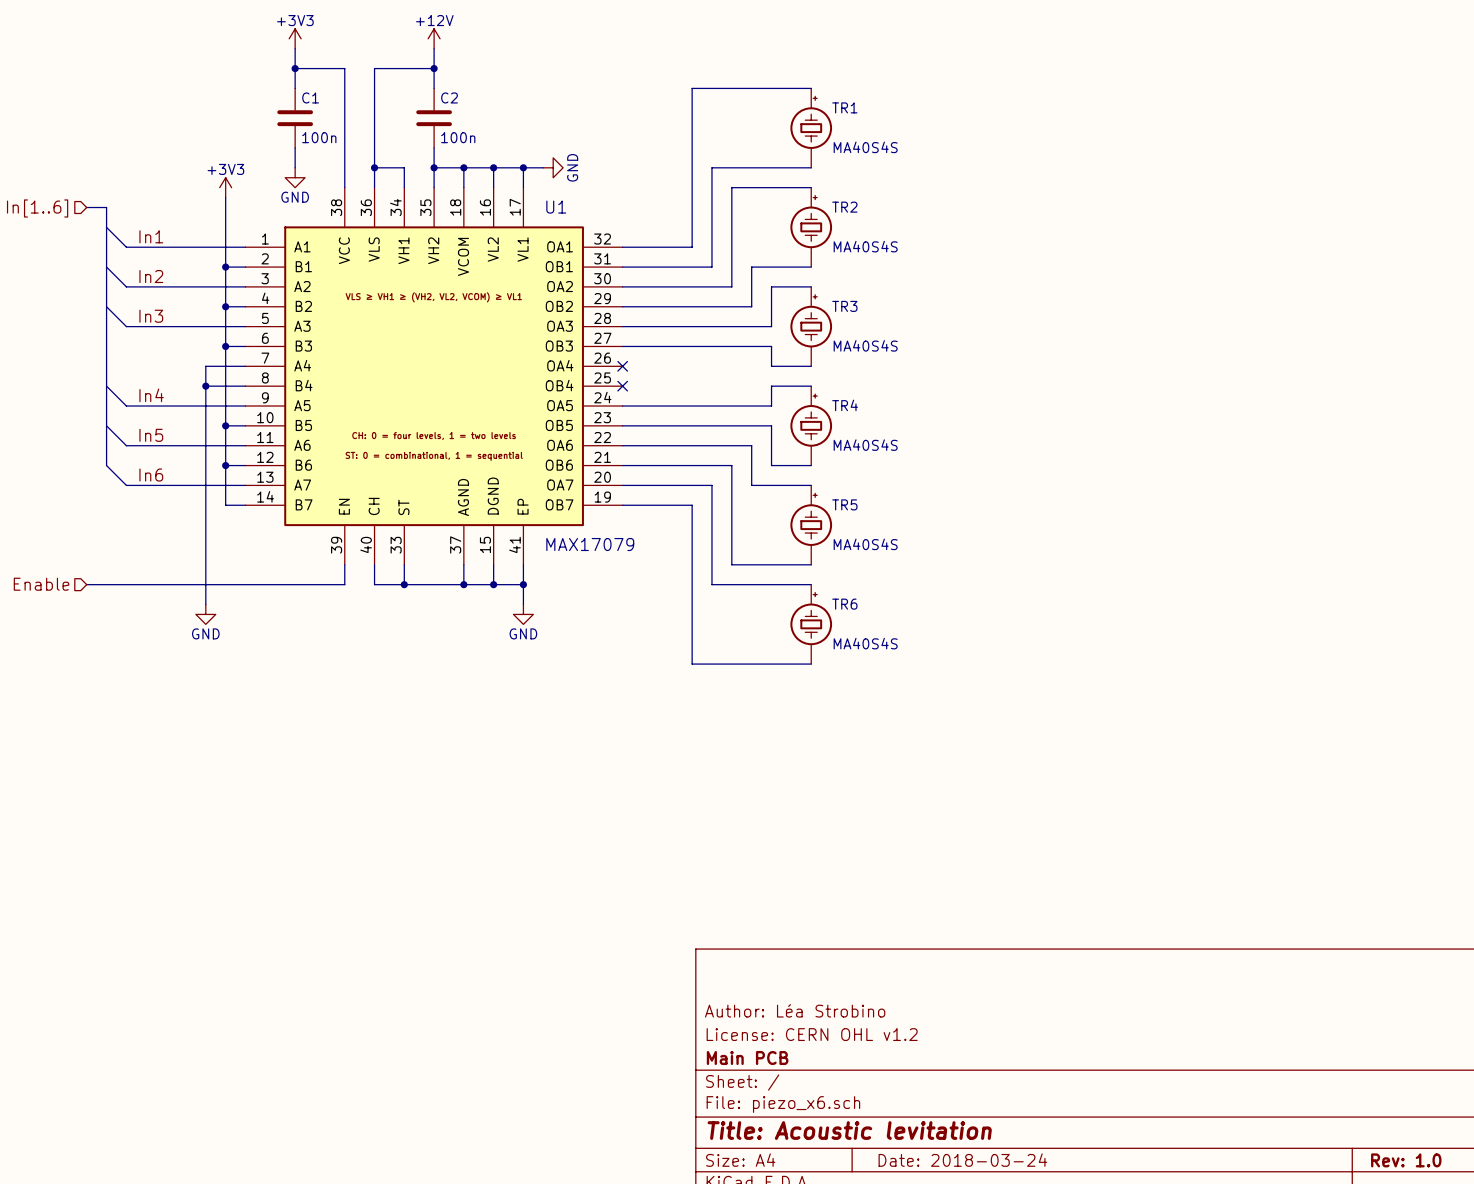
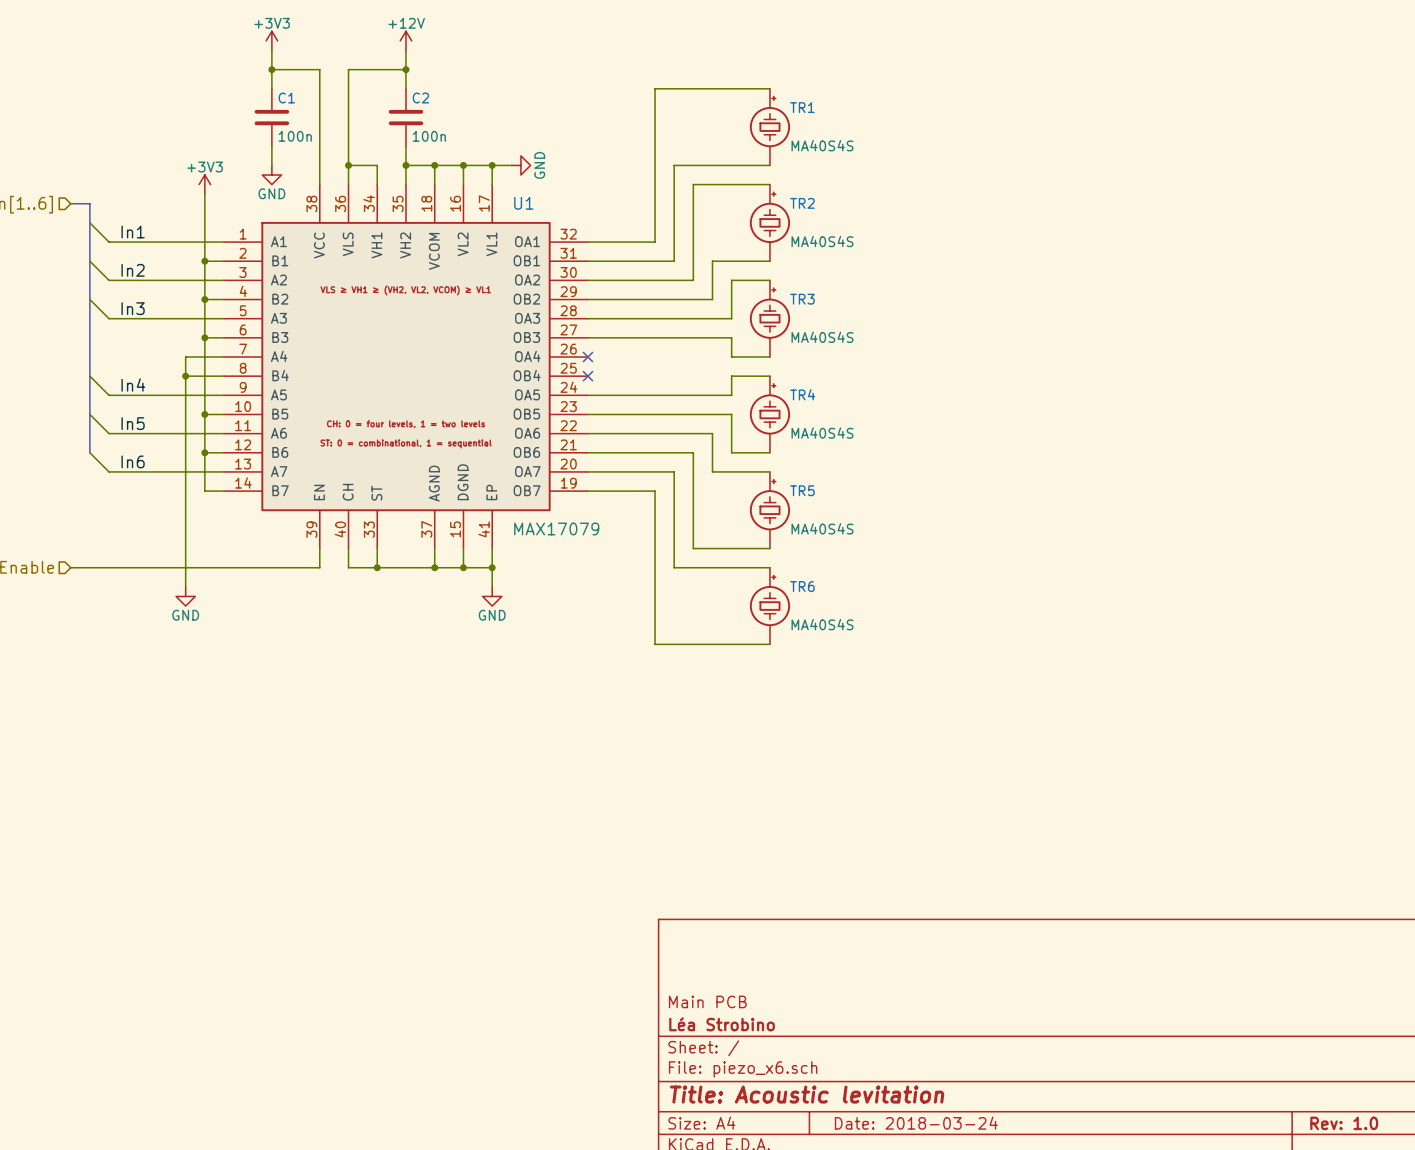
title block: Author: Léa Strobino (795, 1010) -> none
title block: License: CERN OHL v1.2 (812, 1034) -> Main PCB (707, 1001)
title block: Main PCB (747, 1058) -> Léa Strobino (722, 1024)

